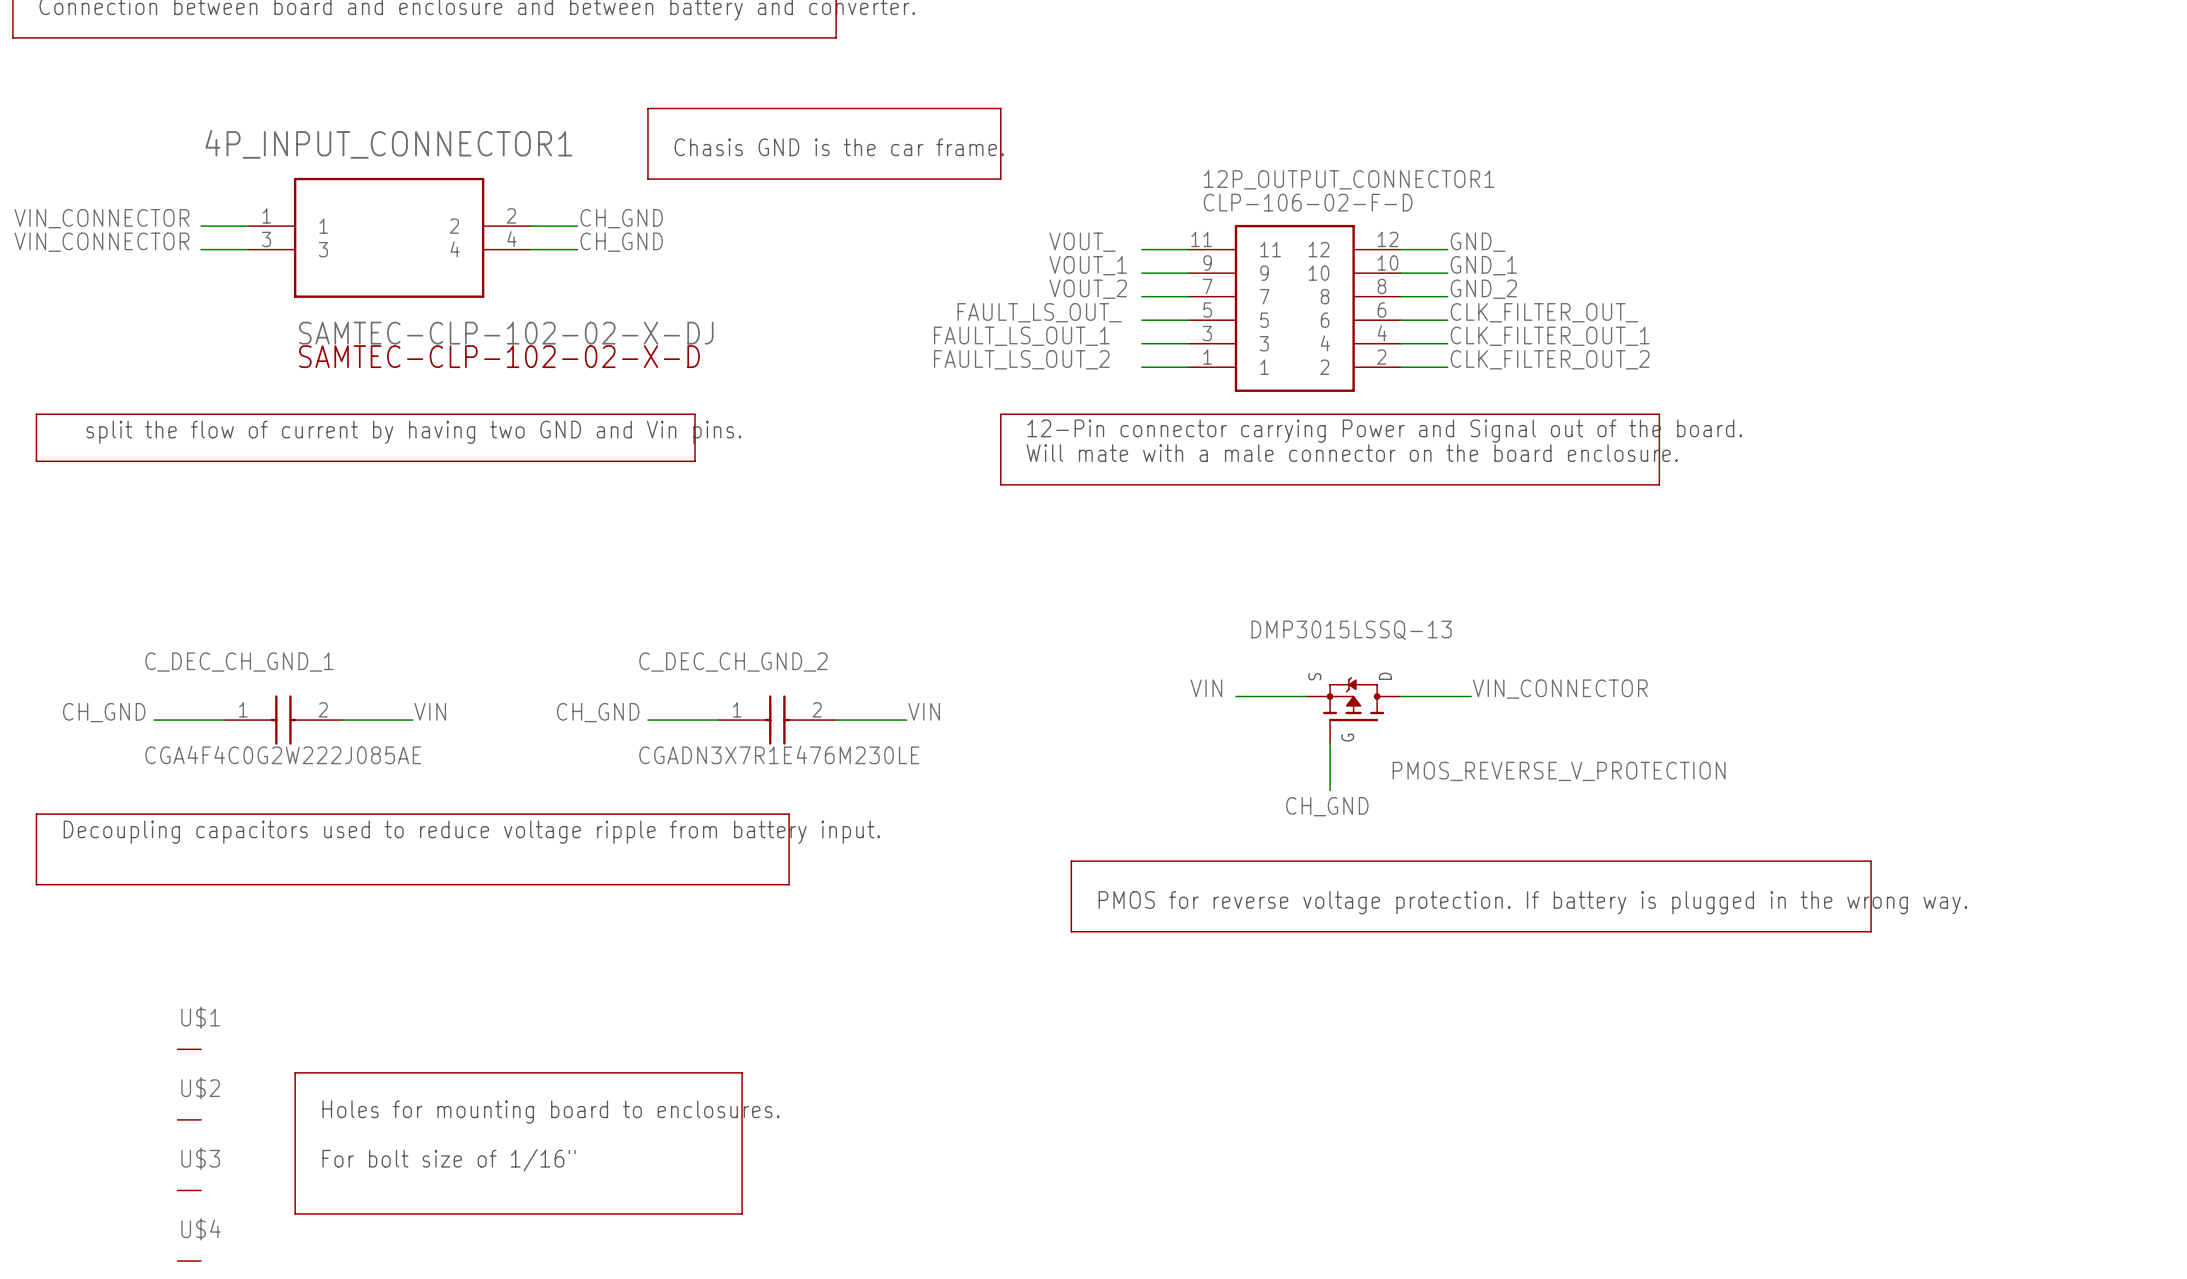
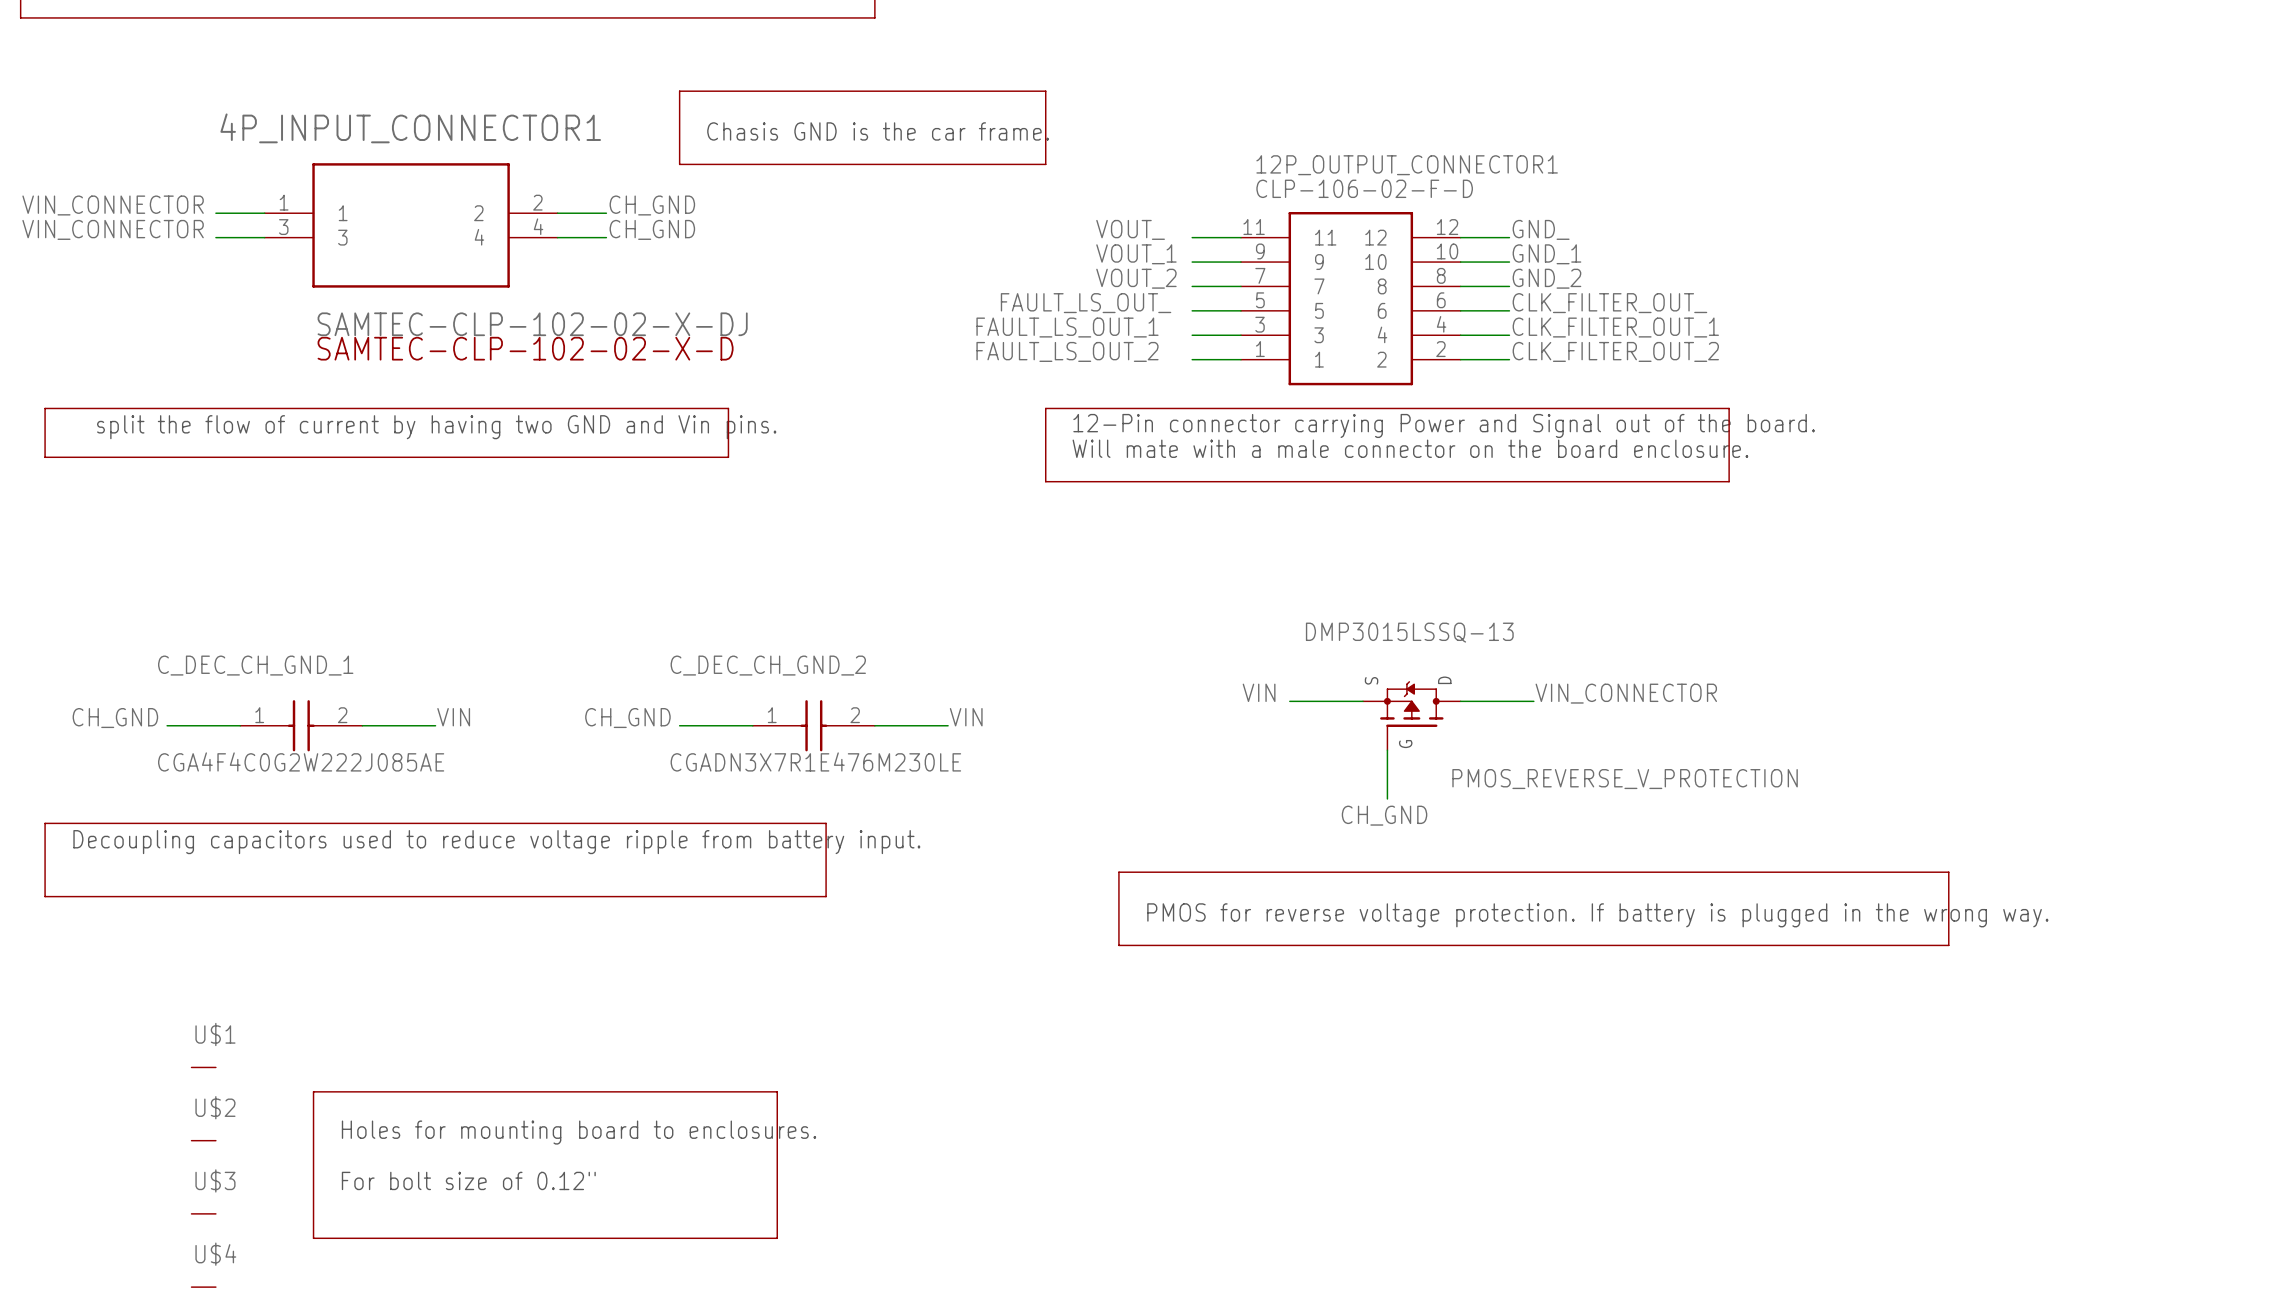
text: For bolt size of 1/16" (449, 1160) -> For bolt size of 0.12" (468, 1180)

